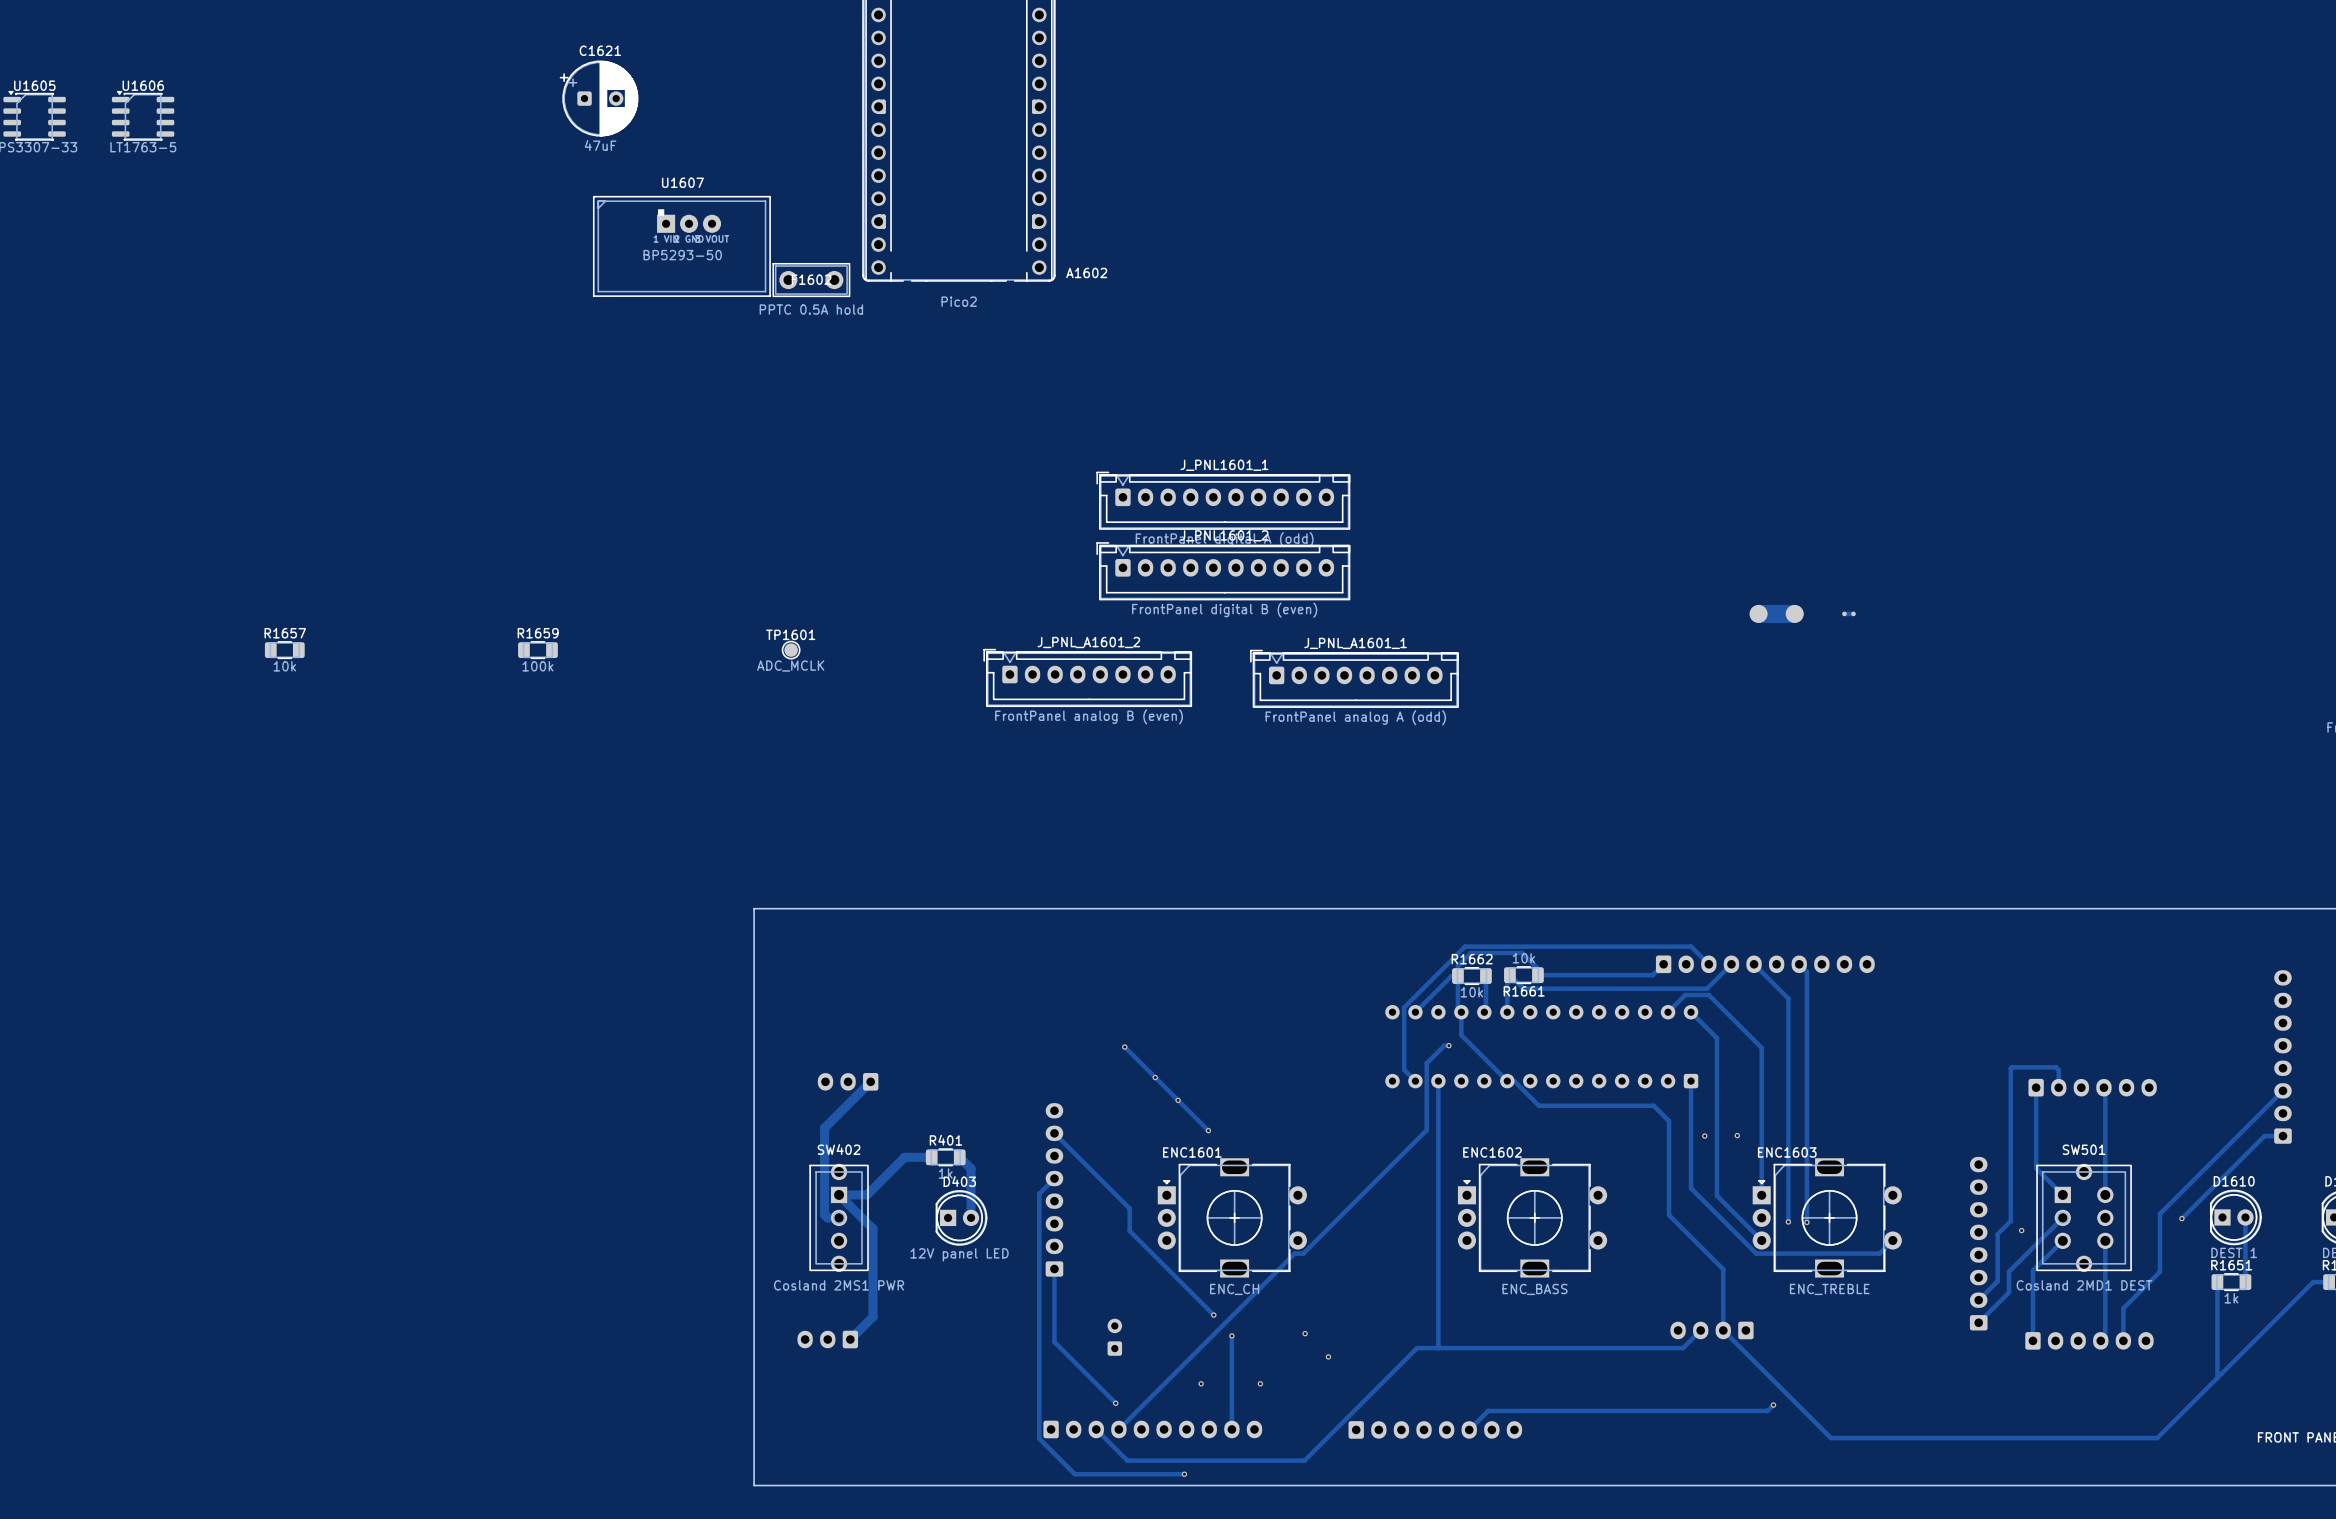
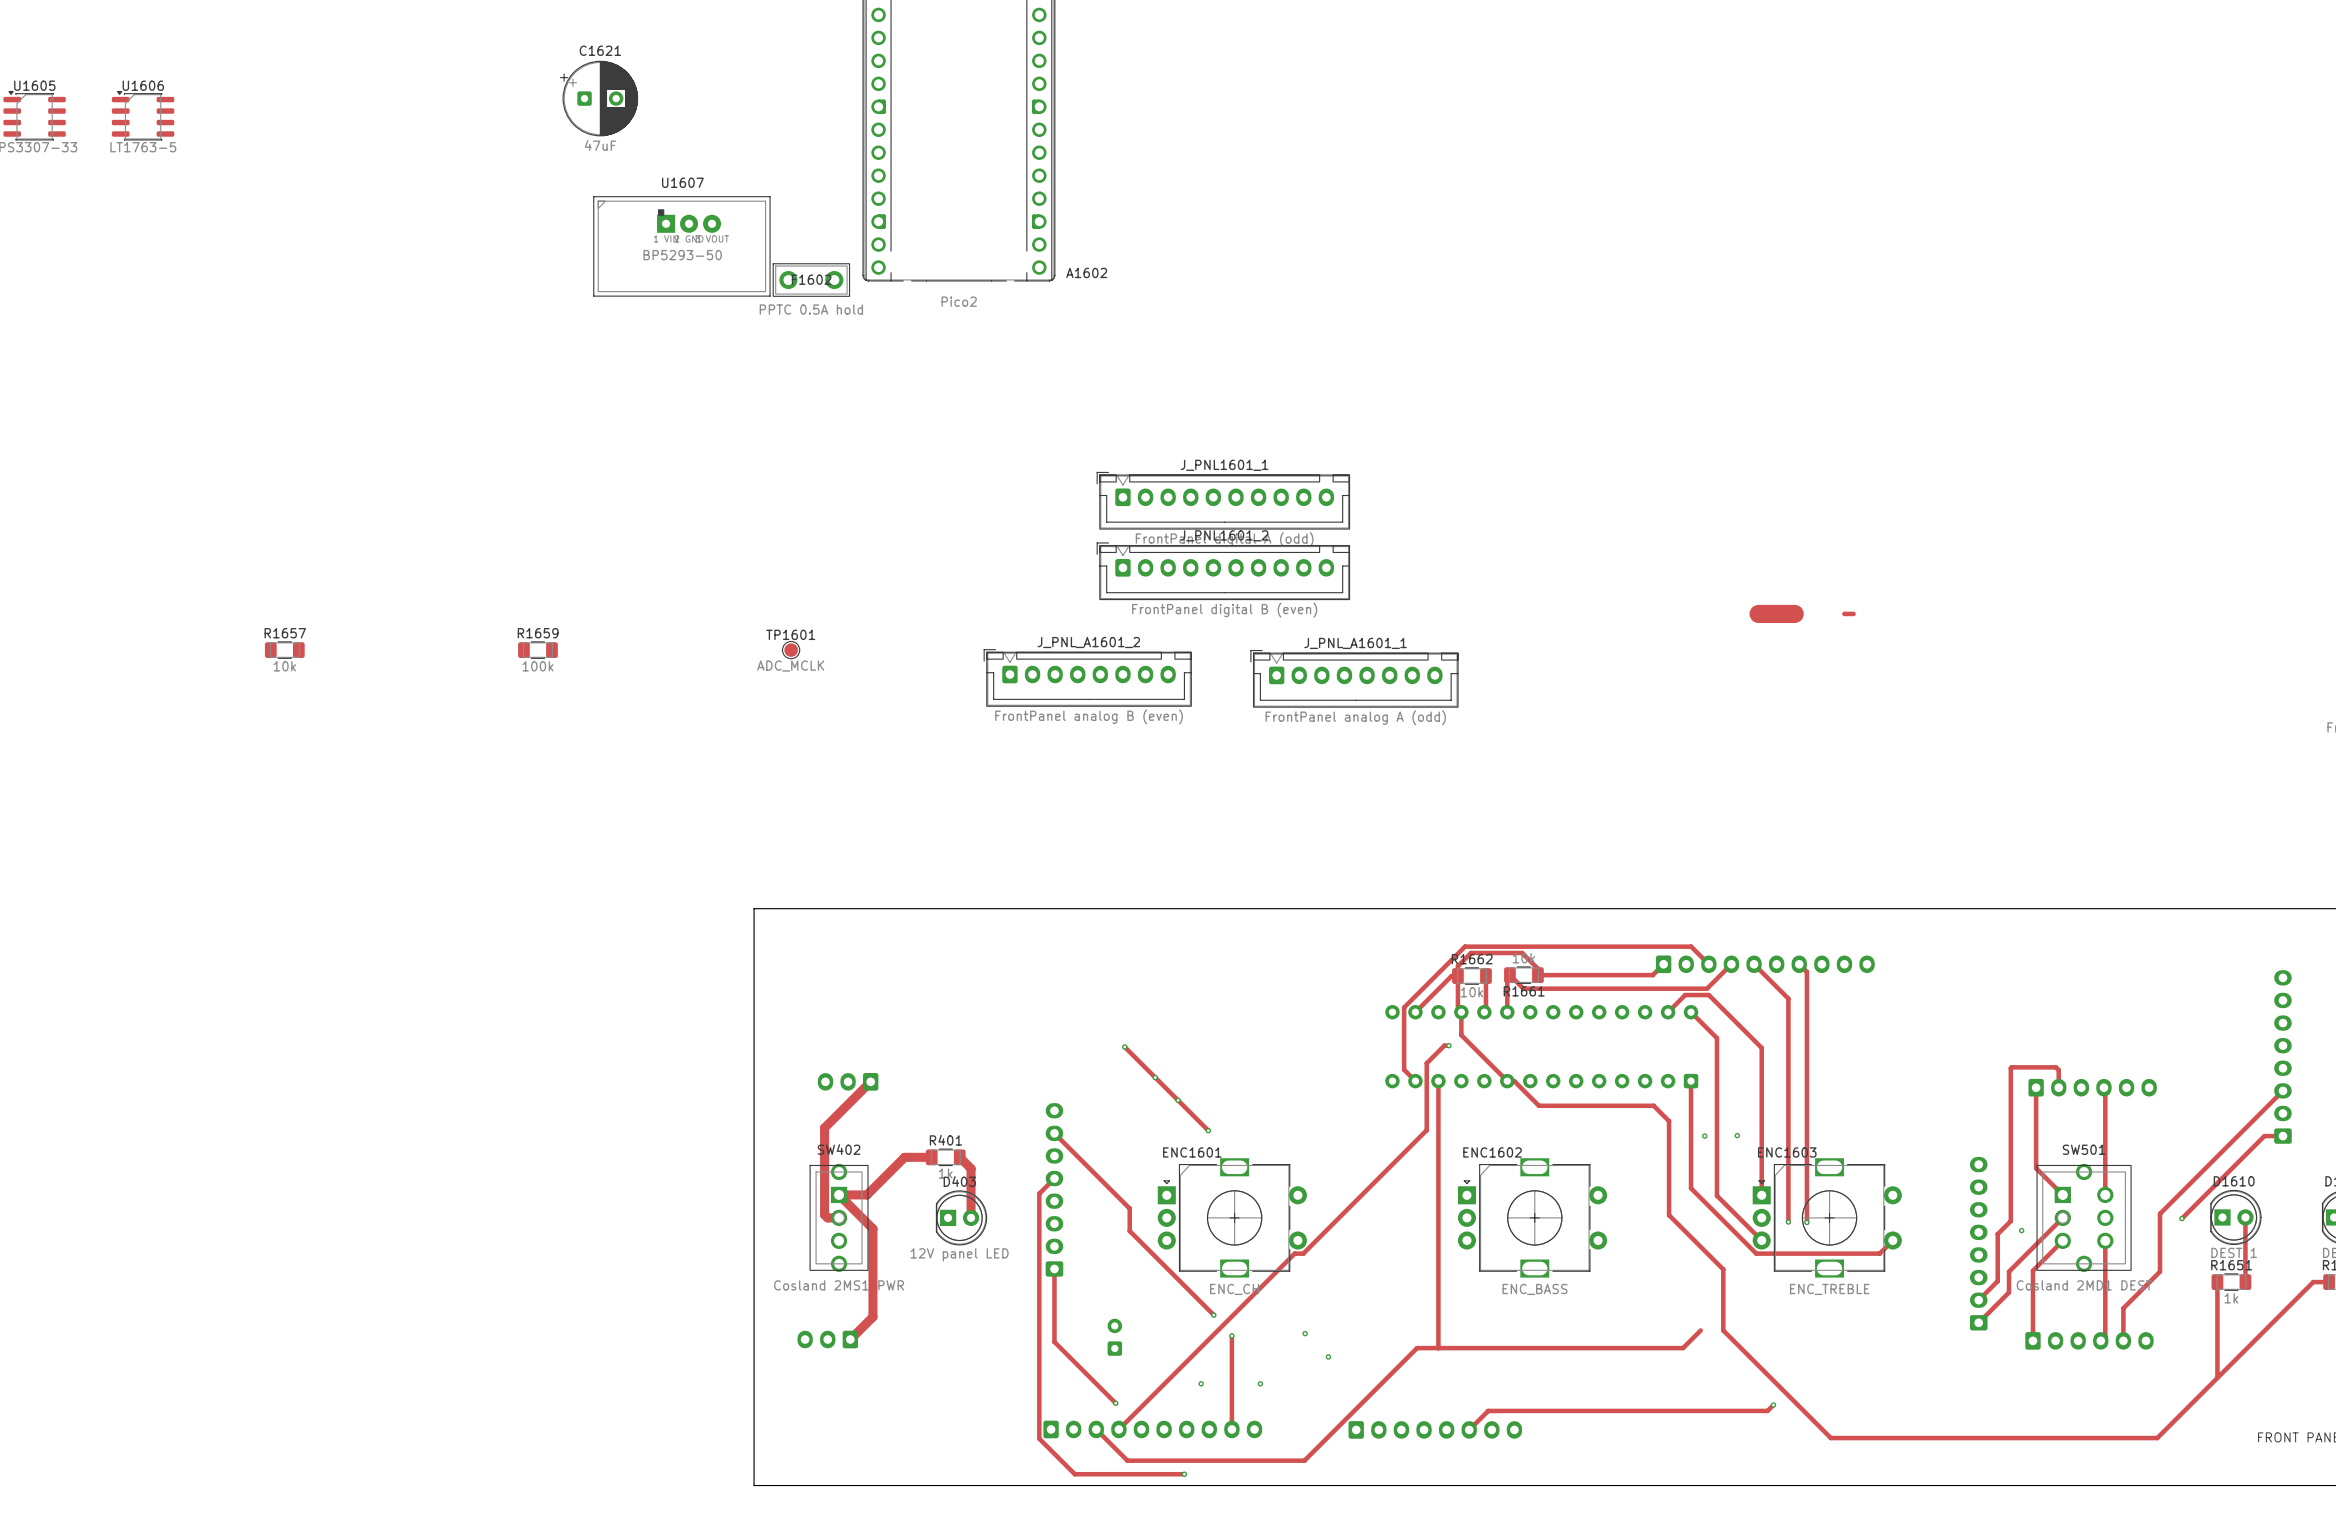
part: (1712, 1330) -> none

